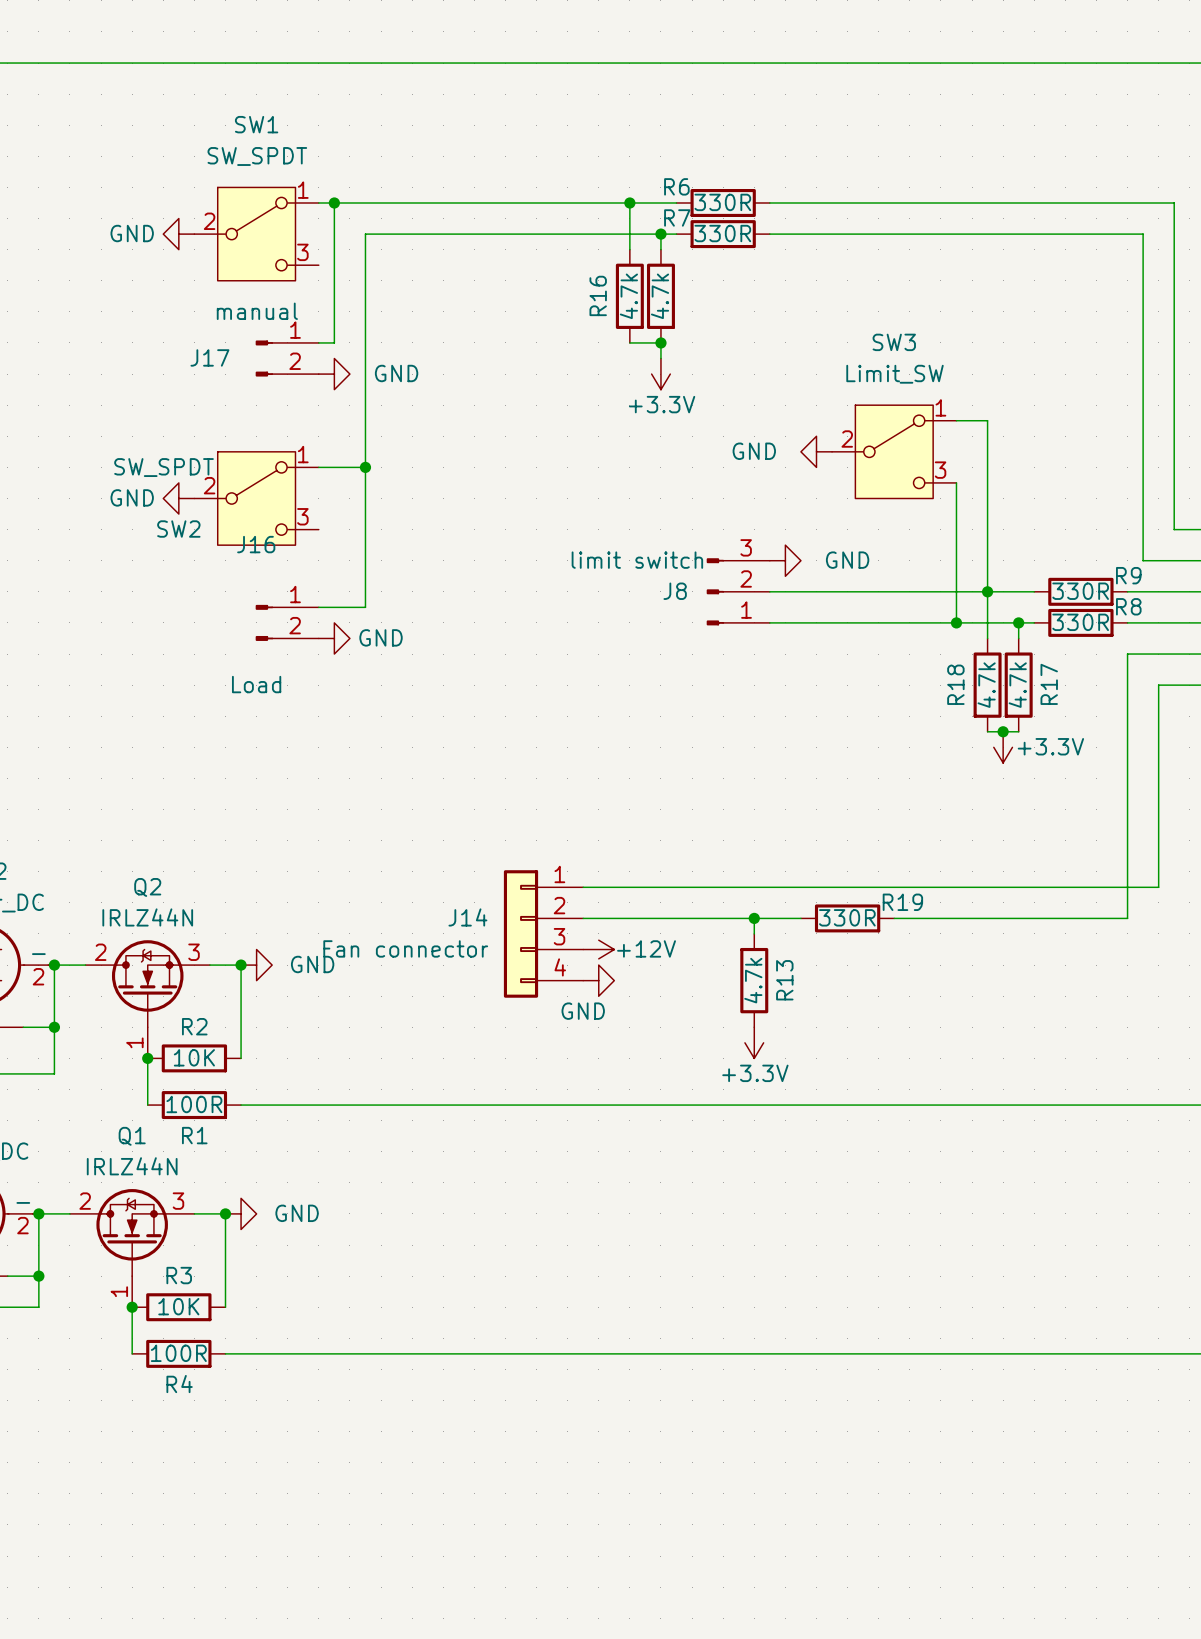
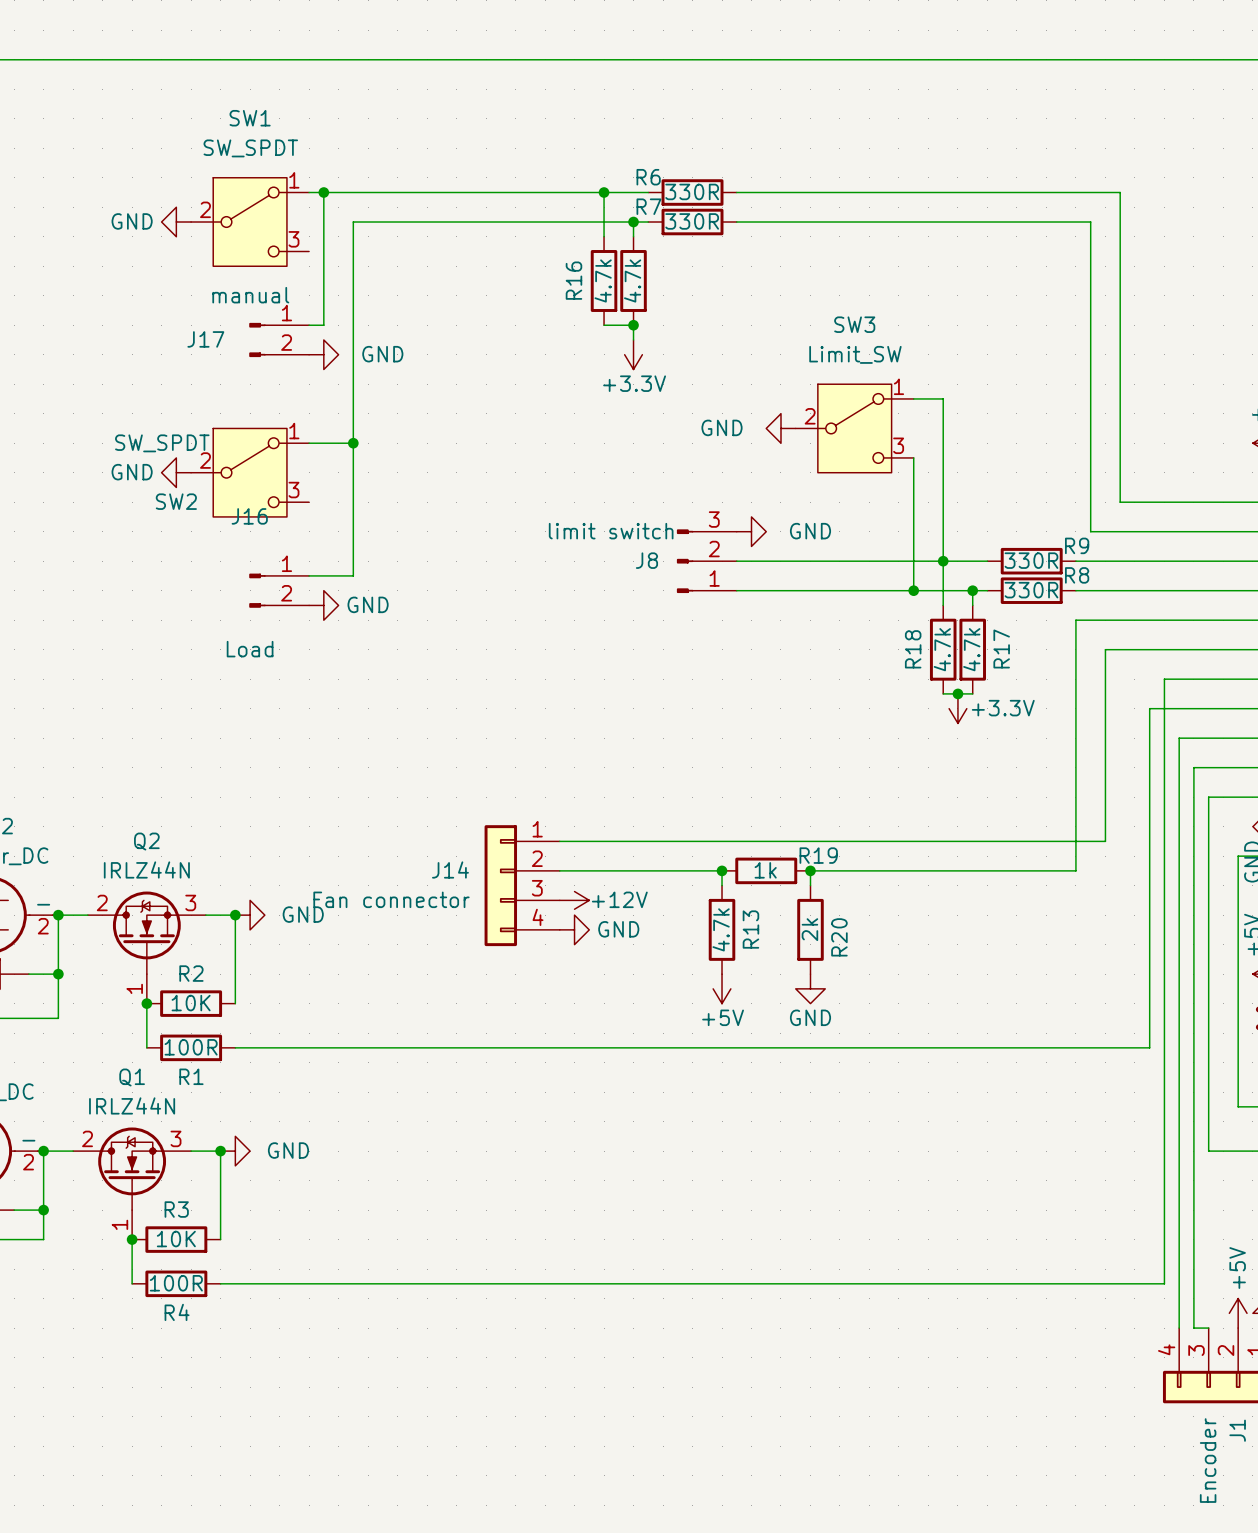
R19 value: 330R (847, 917) -> 1k (765, 870)
wire: (754, 918) (800, 918) -> none
R19 position: (847, 918) -> (766, 870)
junction: none -> (810, 870)
wire: none -> (854, 870) (810, 870) (810, 885)
R20: none -> 2k (810, 929)
power symbol text position: GND (583, 1011) -> GND (618, 929)
power symbol: +3.3V (754, 1042) -> +5V (722, 988)
power symbol: none -> GND (810, 988)

